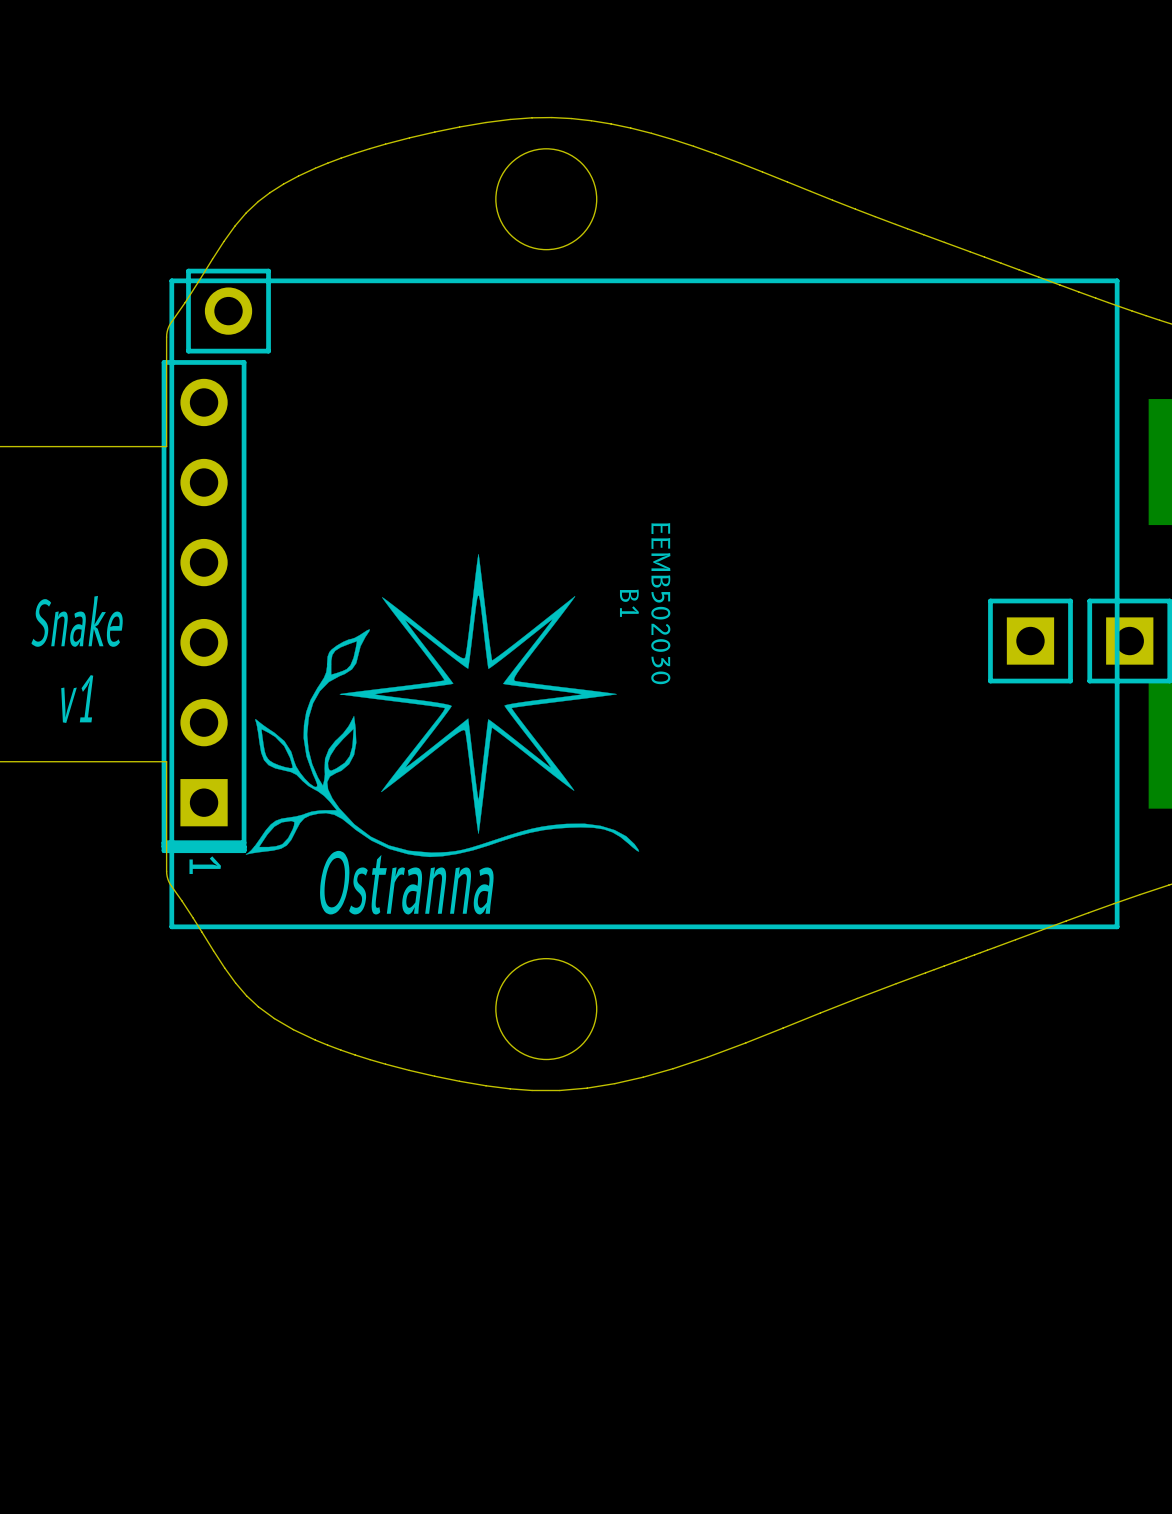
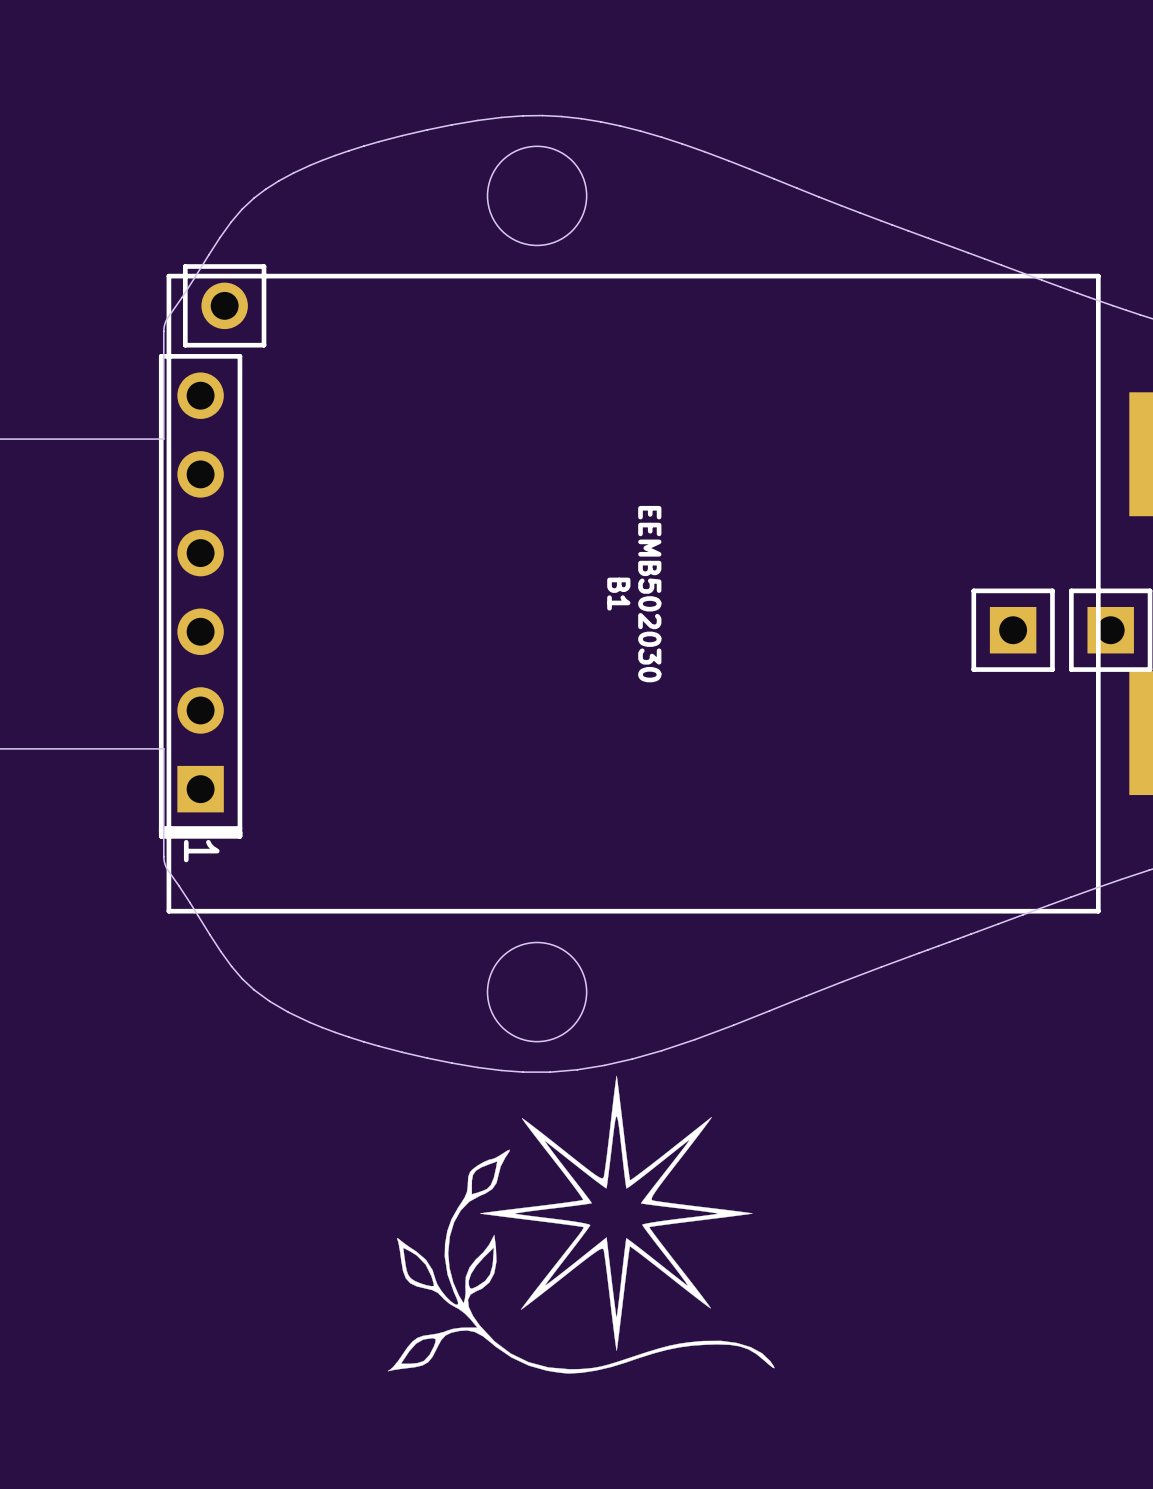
text: Snake (77, 621) -> none
text: v1 (77, 699) -> none
drawing position: (442, 705) -> (581, 1224)
text: Ostranna (406, 882) -> none

